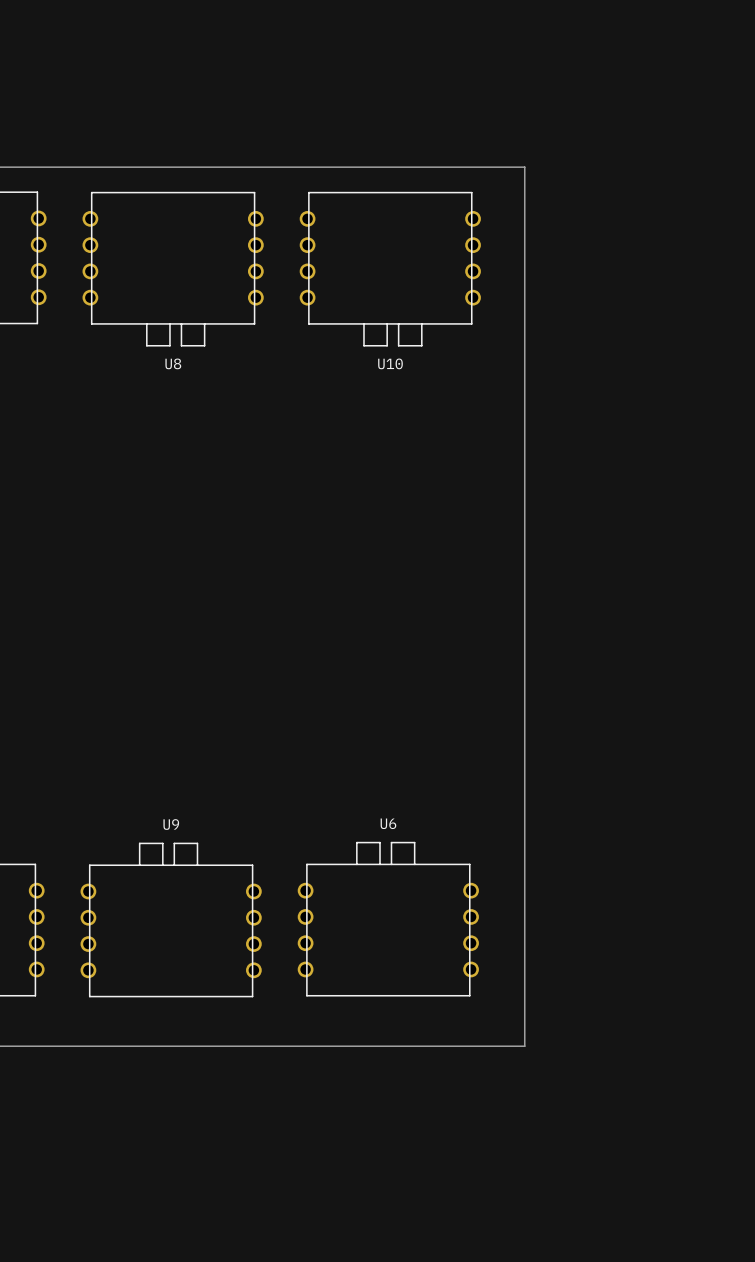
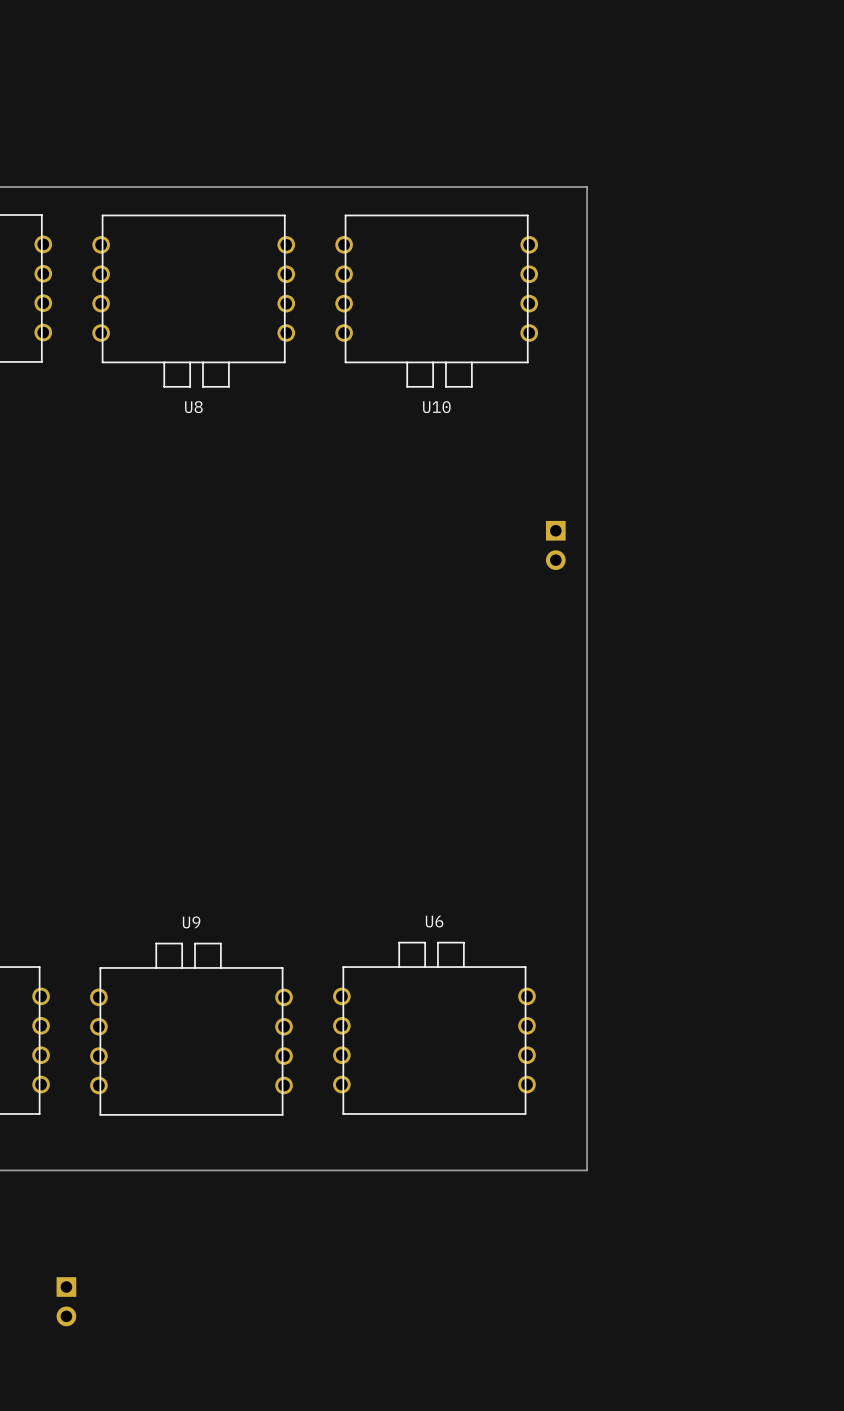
part: none -> (555, 545)
part: none -> (66, 1301)

